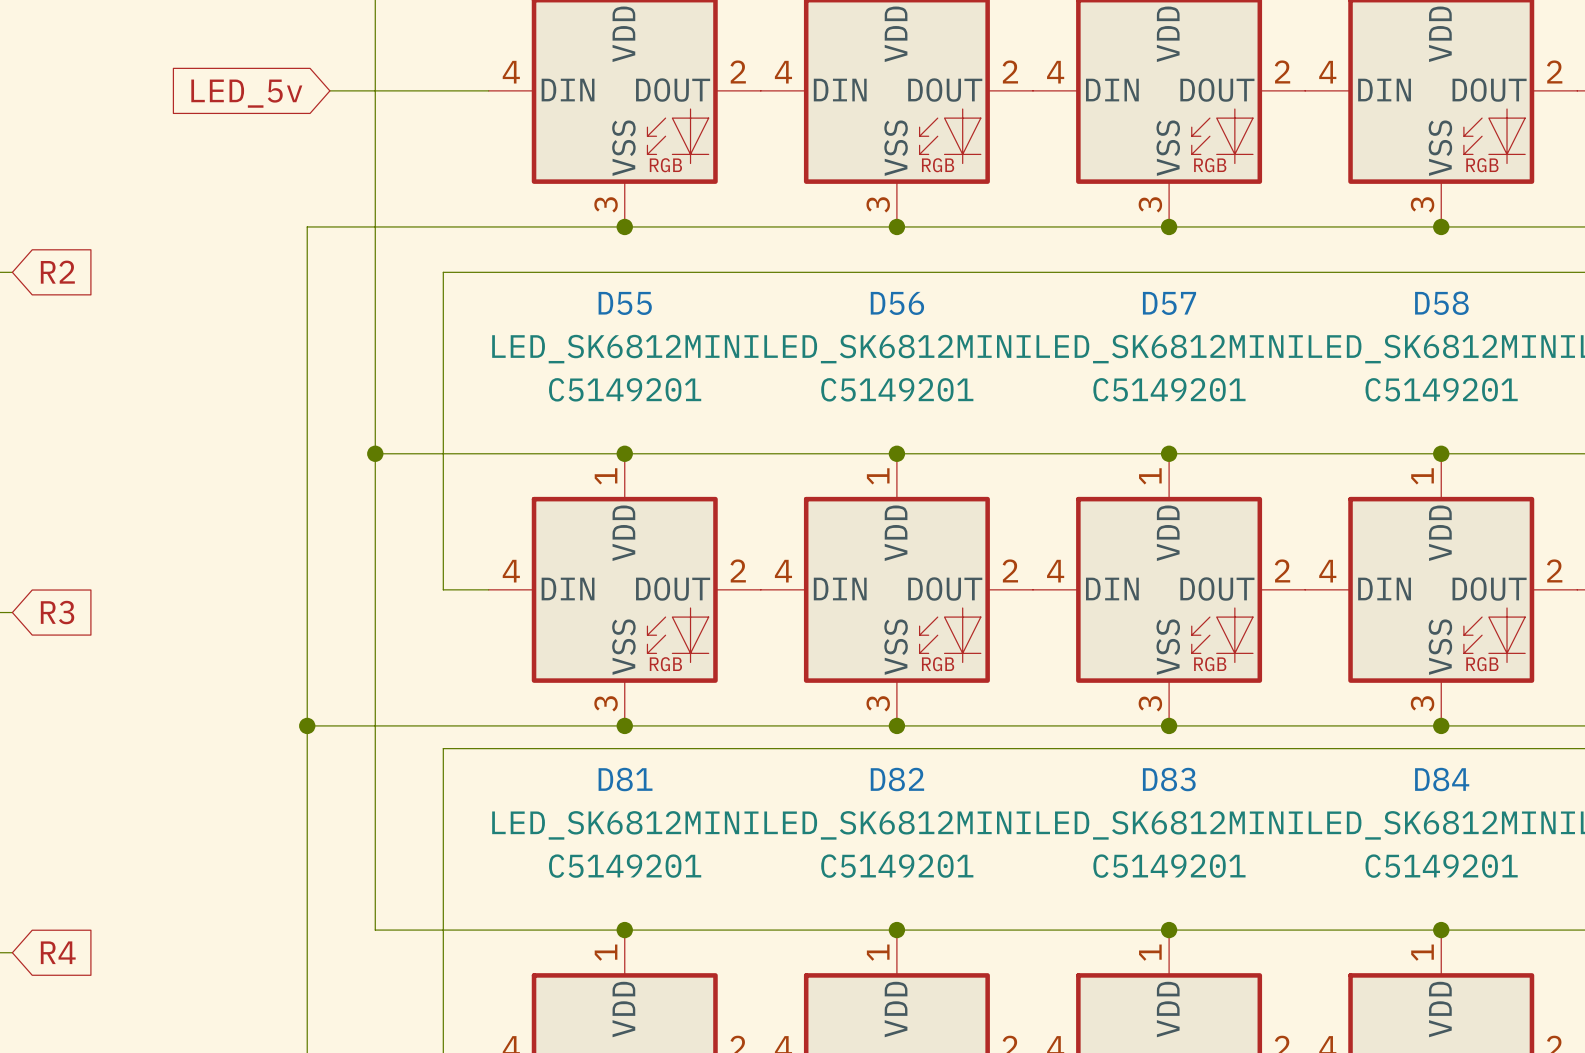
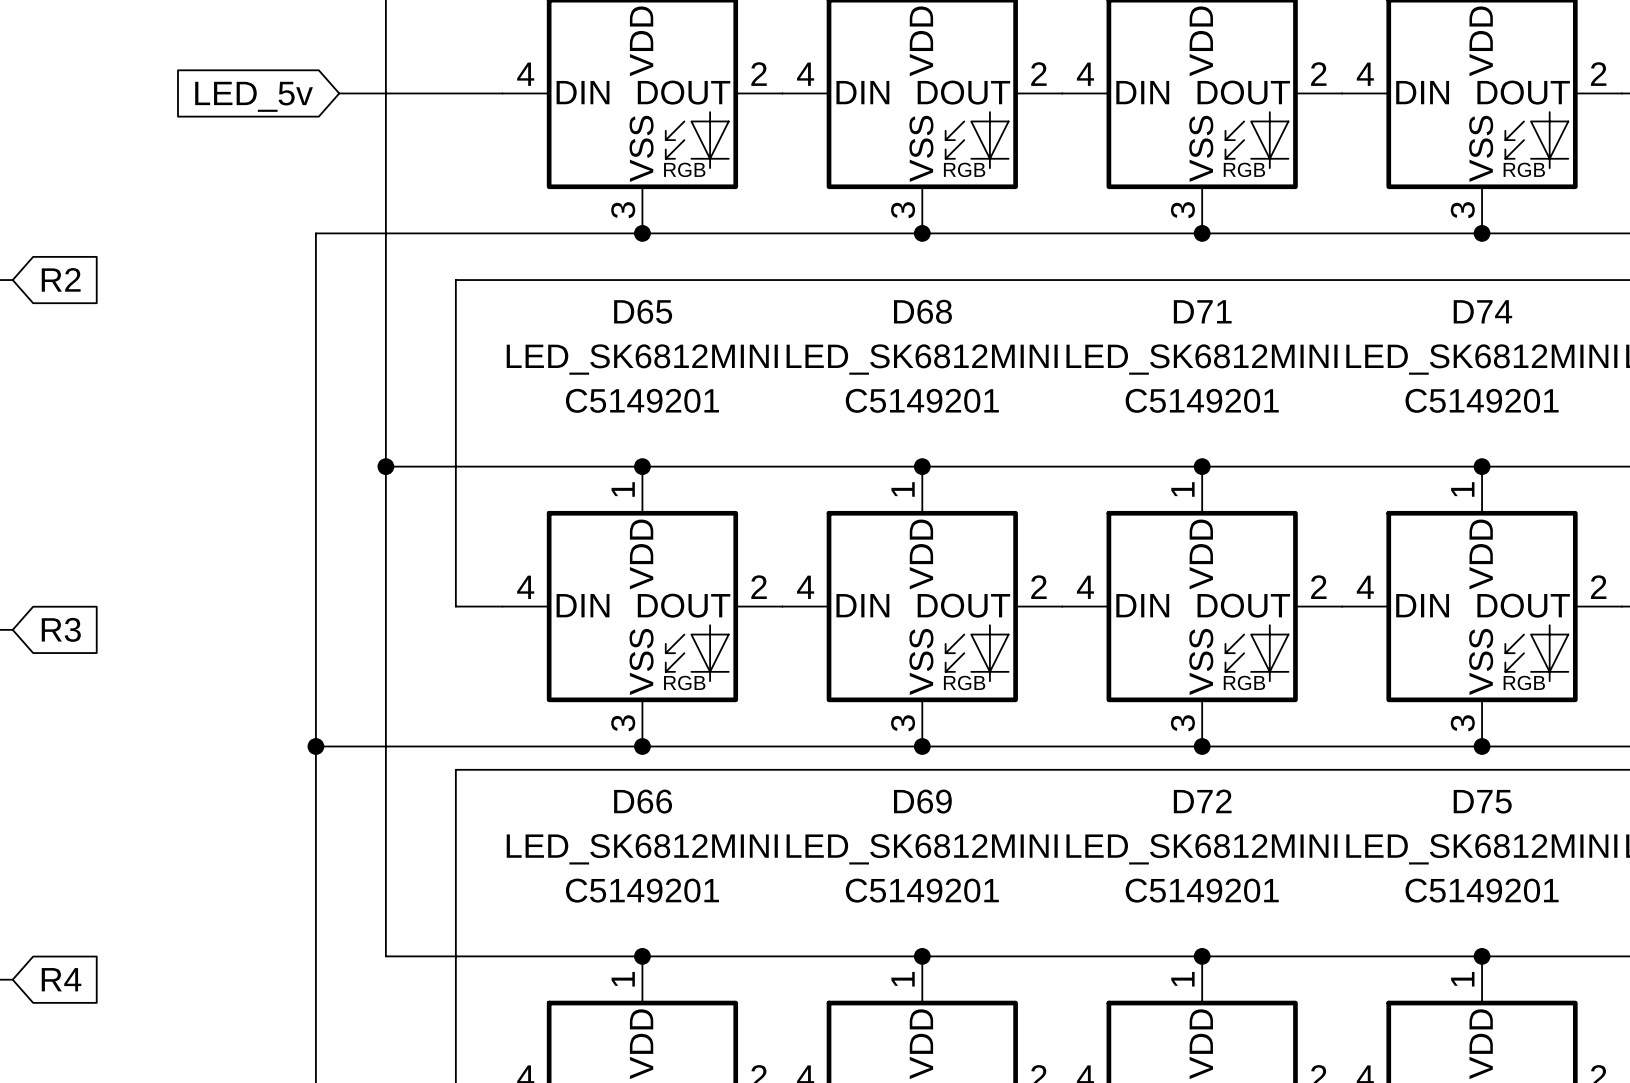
D55 name: D55 (625, 303) -> D65 (643, 311)
D56 name: D56 (897, 303) -> D68 (922, 311)
D57 name: D57 (1169, 303) -> D71 (1202, 311)
D58 name: D58 (1441, 303) -> D74 (1482, 311)
D81 name: D81 (625, 779) -> D66 (643, 801)
D82 name: D82 (897, 779) -> D69 (922, 801)
D83 name: D83 (1169, 779) -> D72 (1202, 801)
D84 name: D84 (1442, 779) -> D75 (1482, 801)

